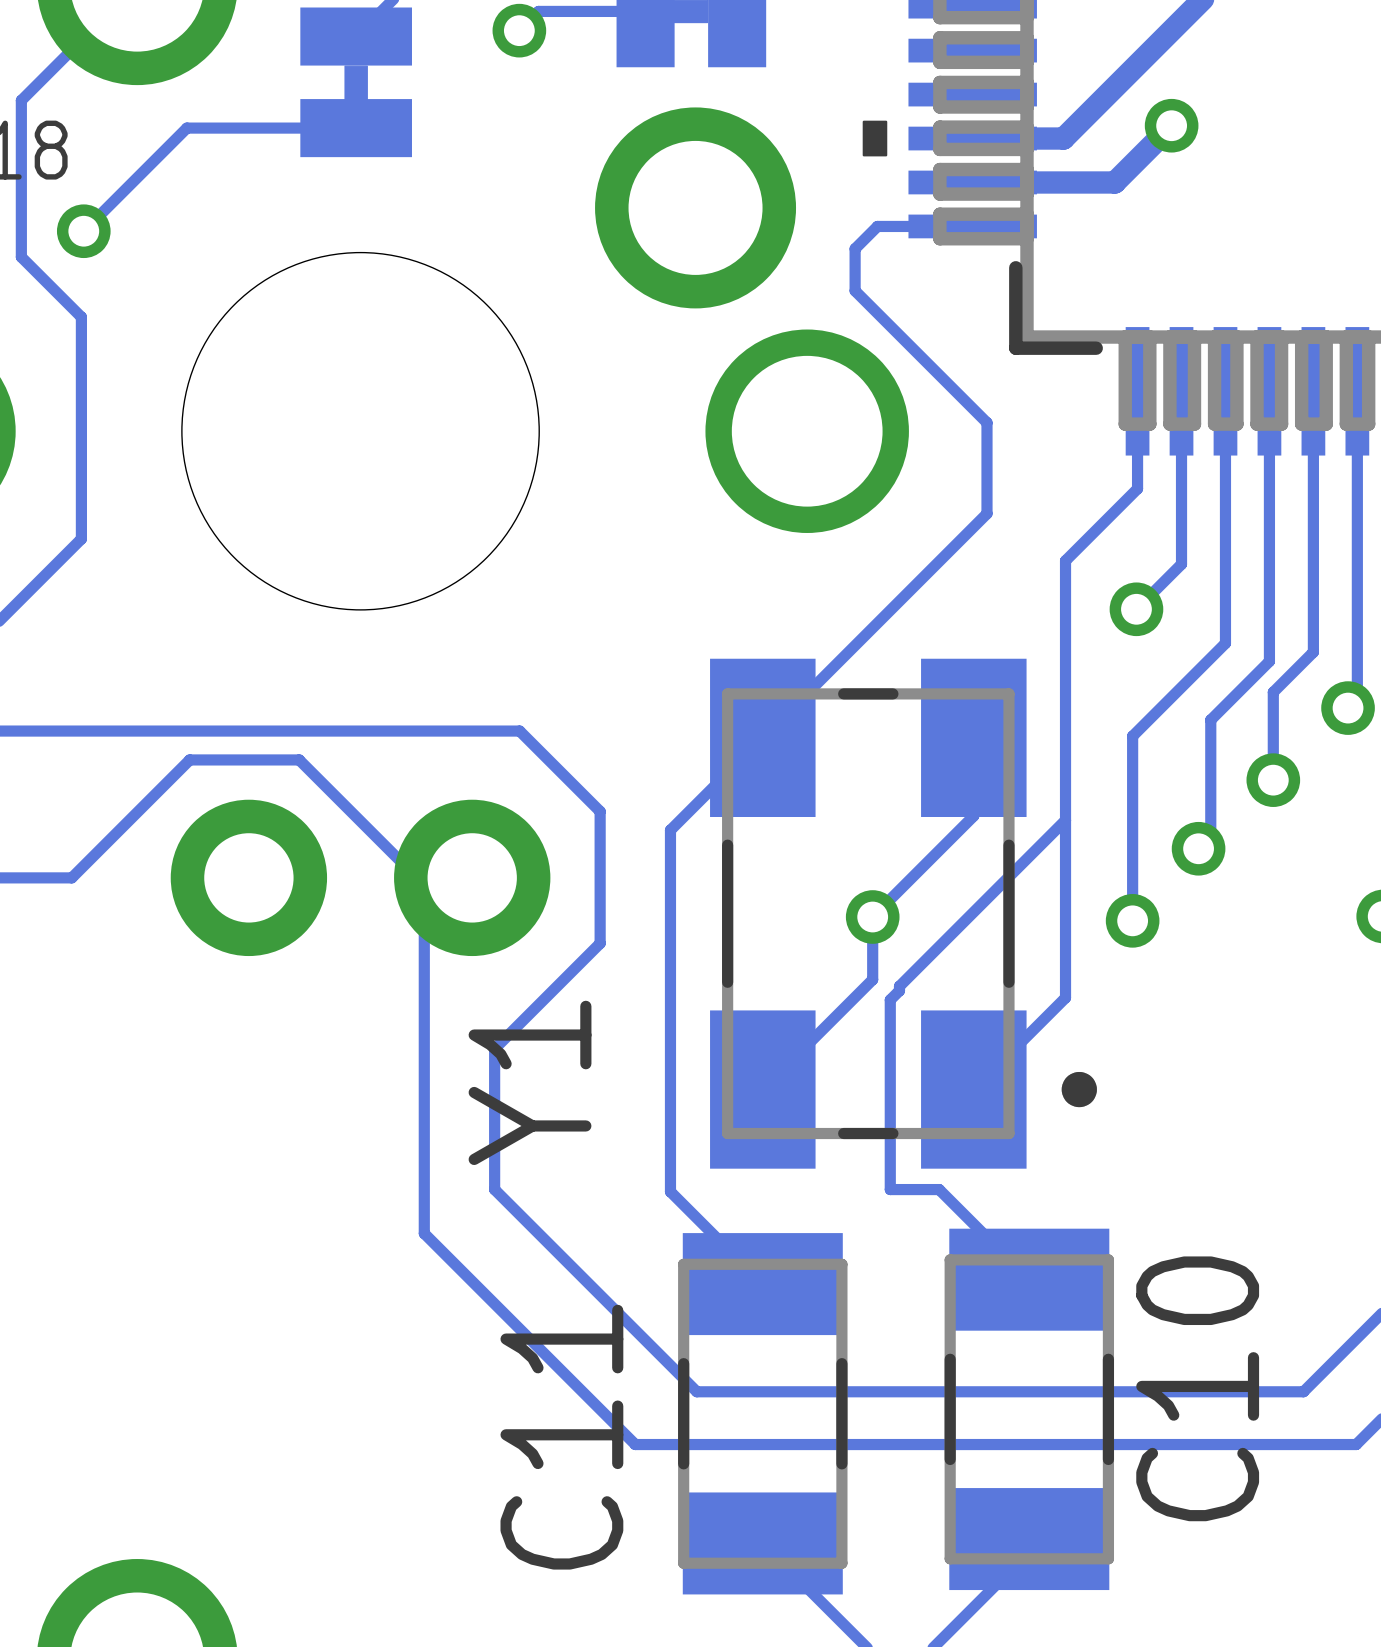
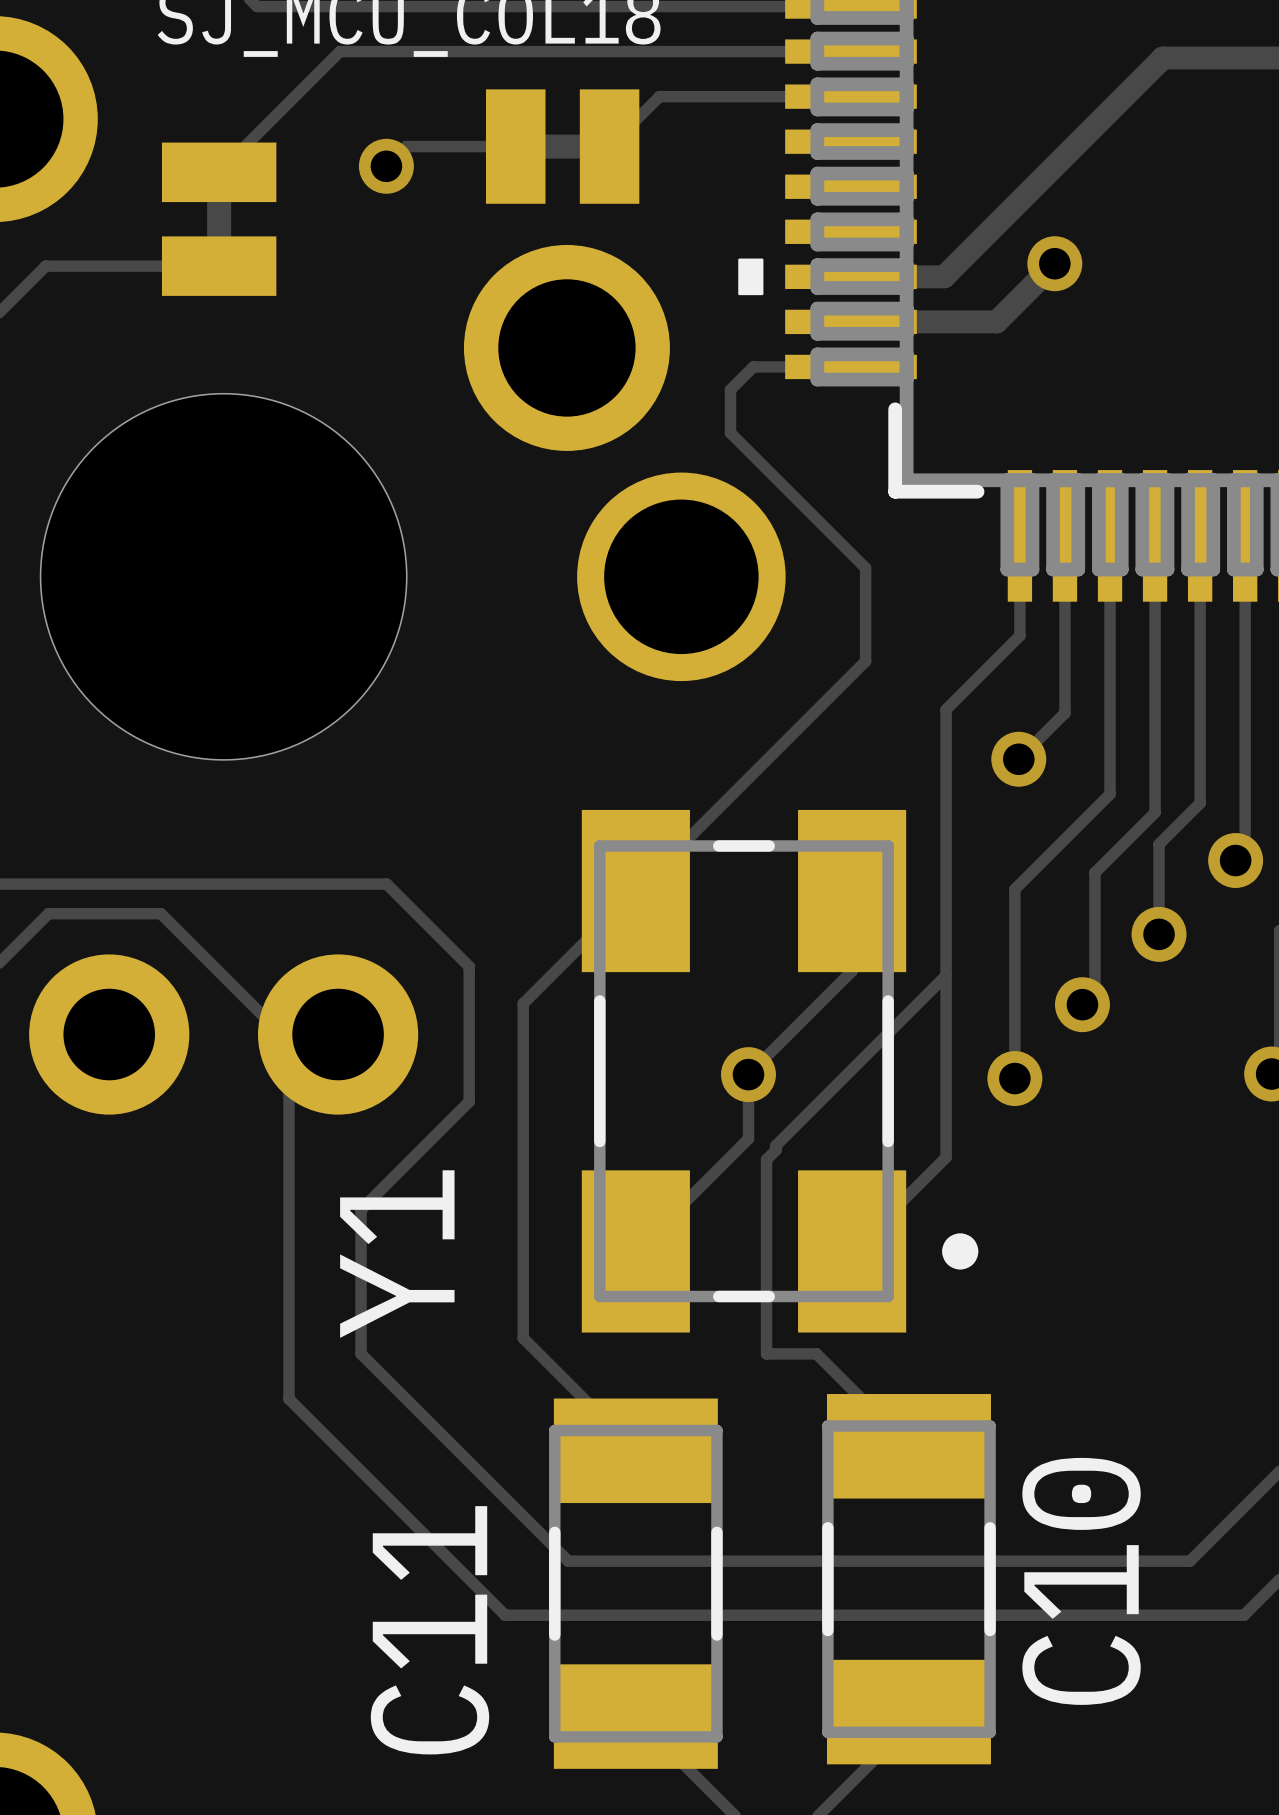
track: (670, 830) (670, 1191) -> (541, 985) (523, 1003) (523, 1338) (541, 1356)

